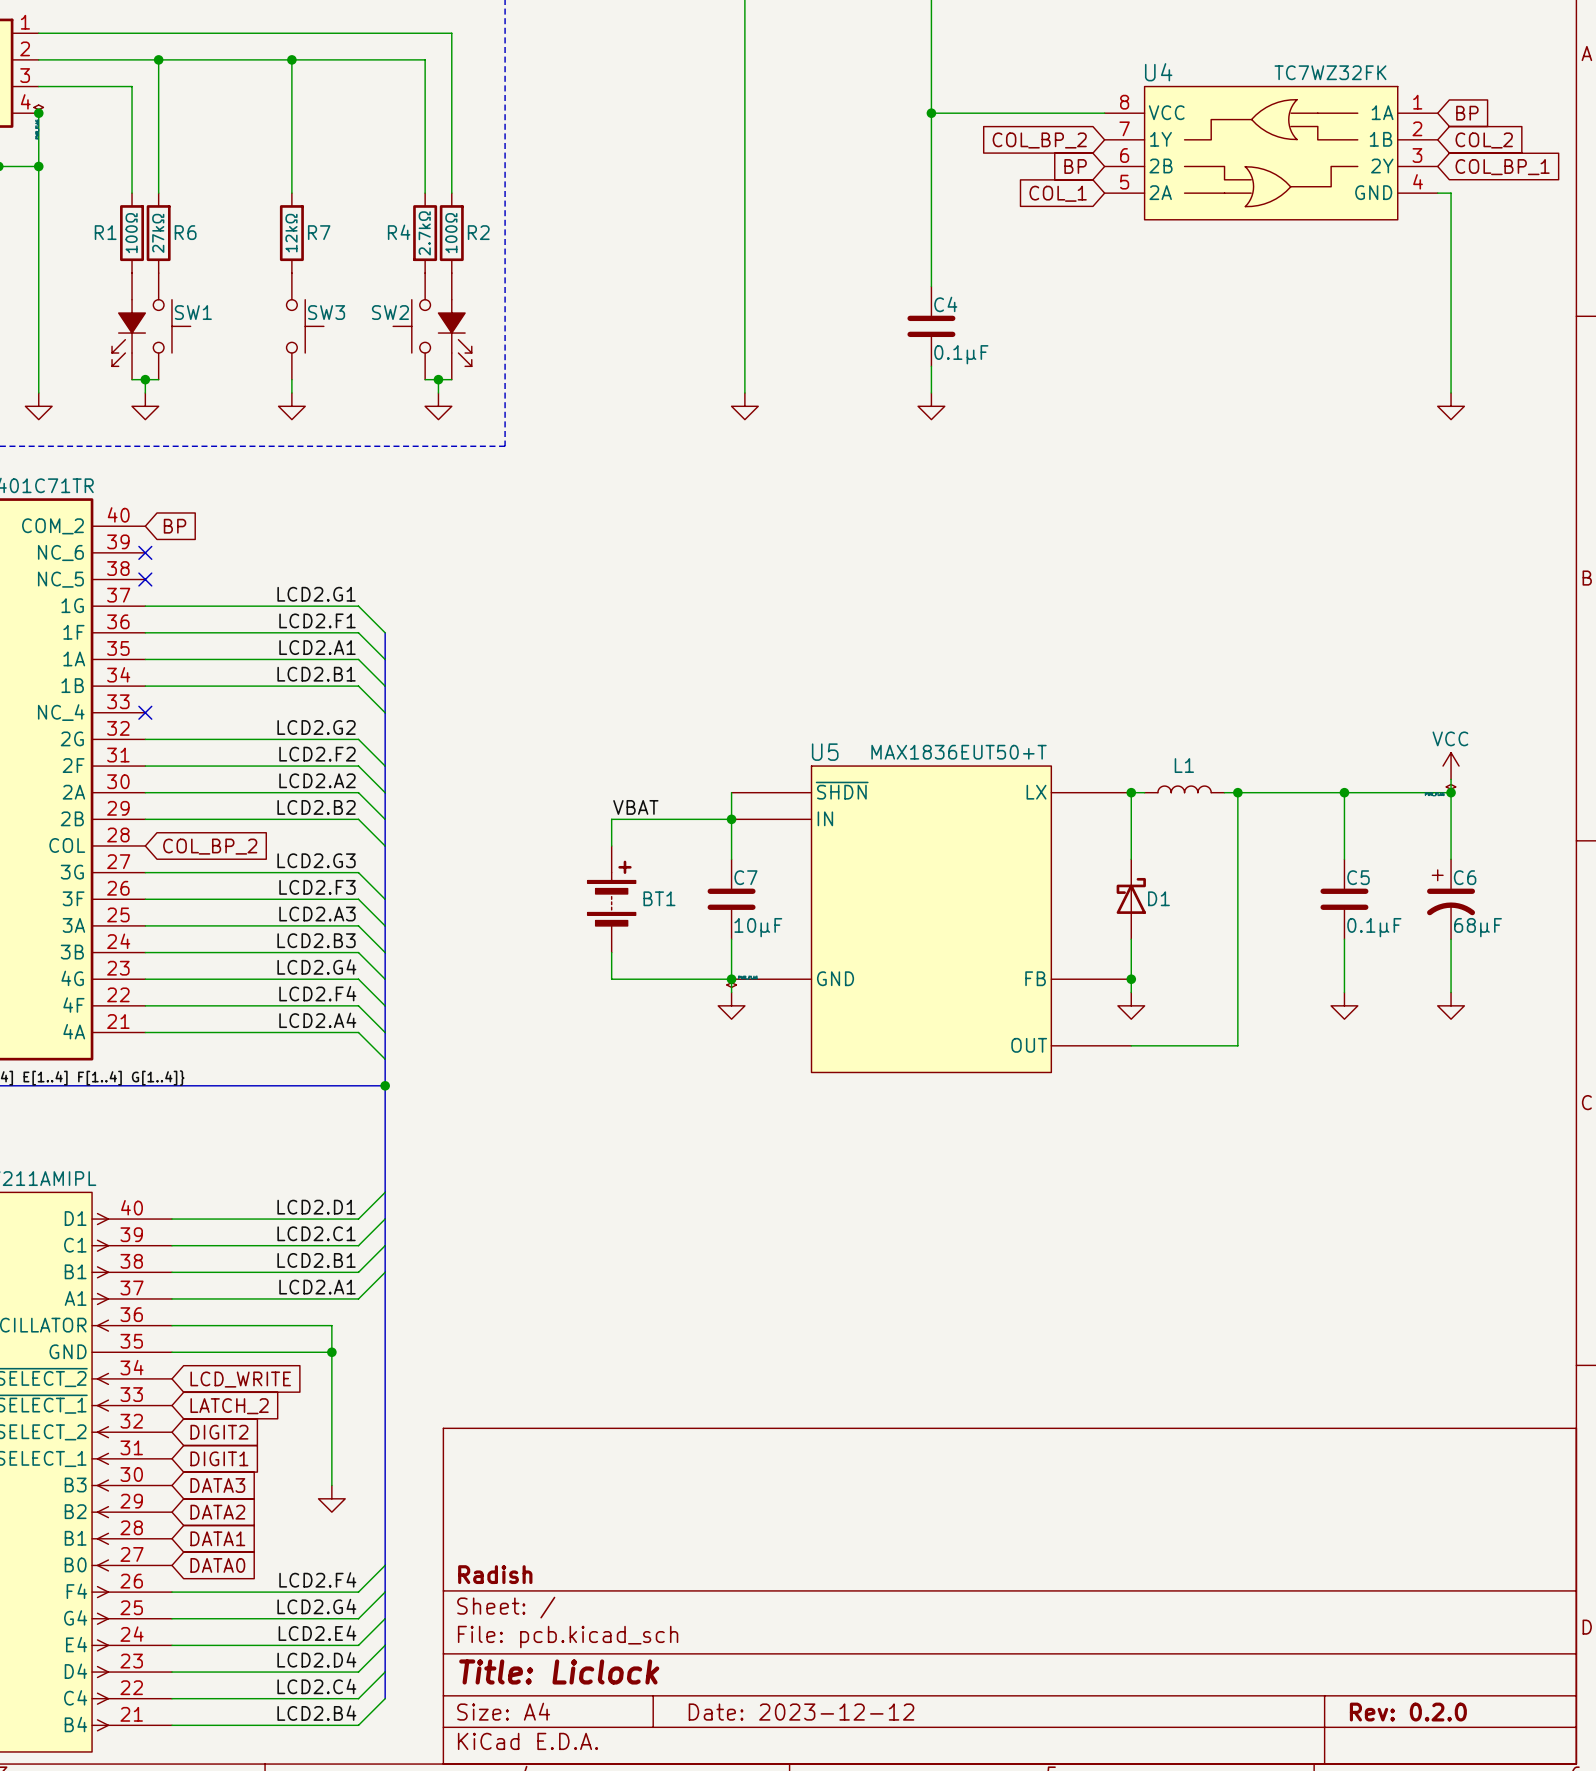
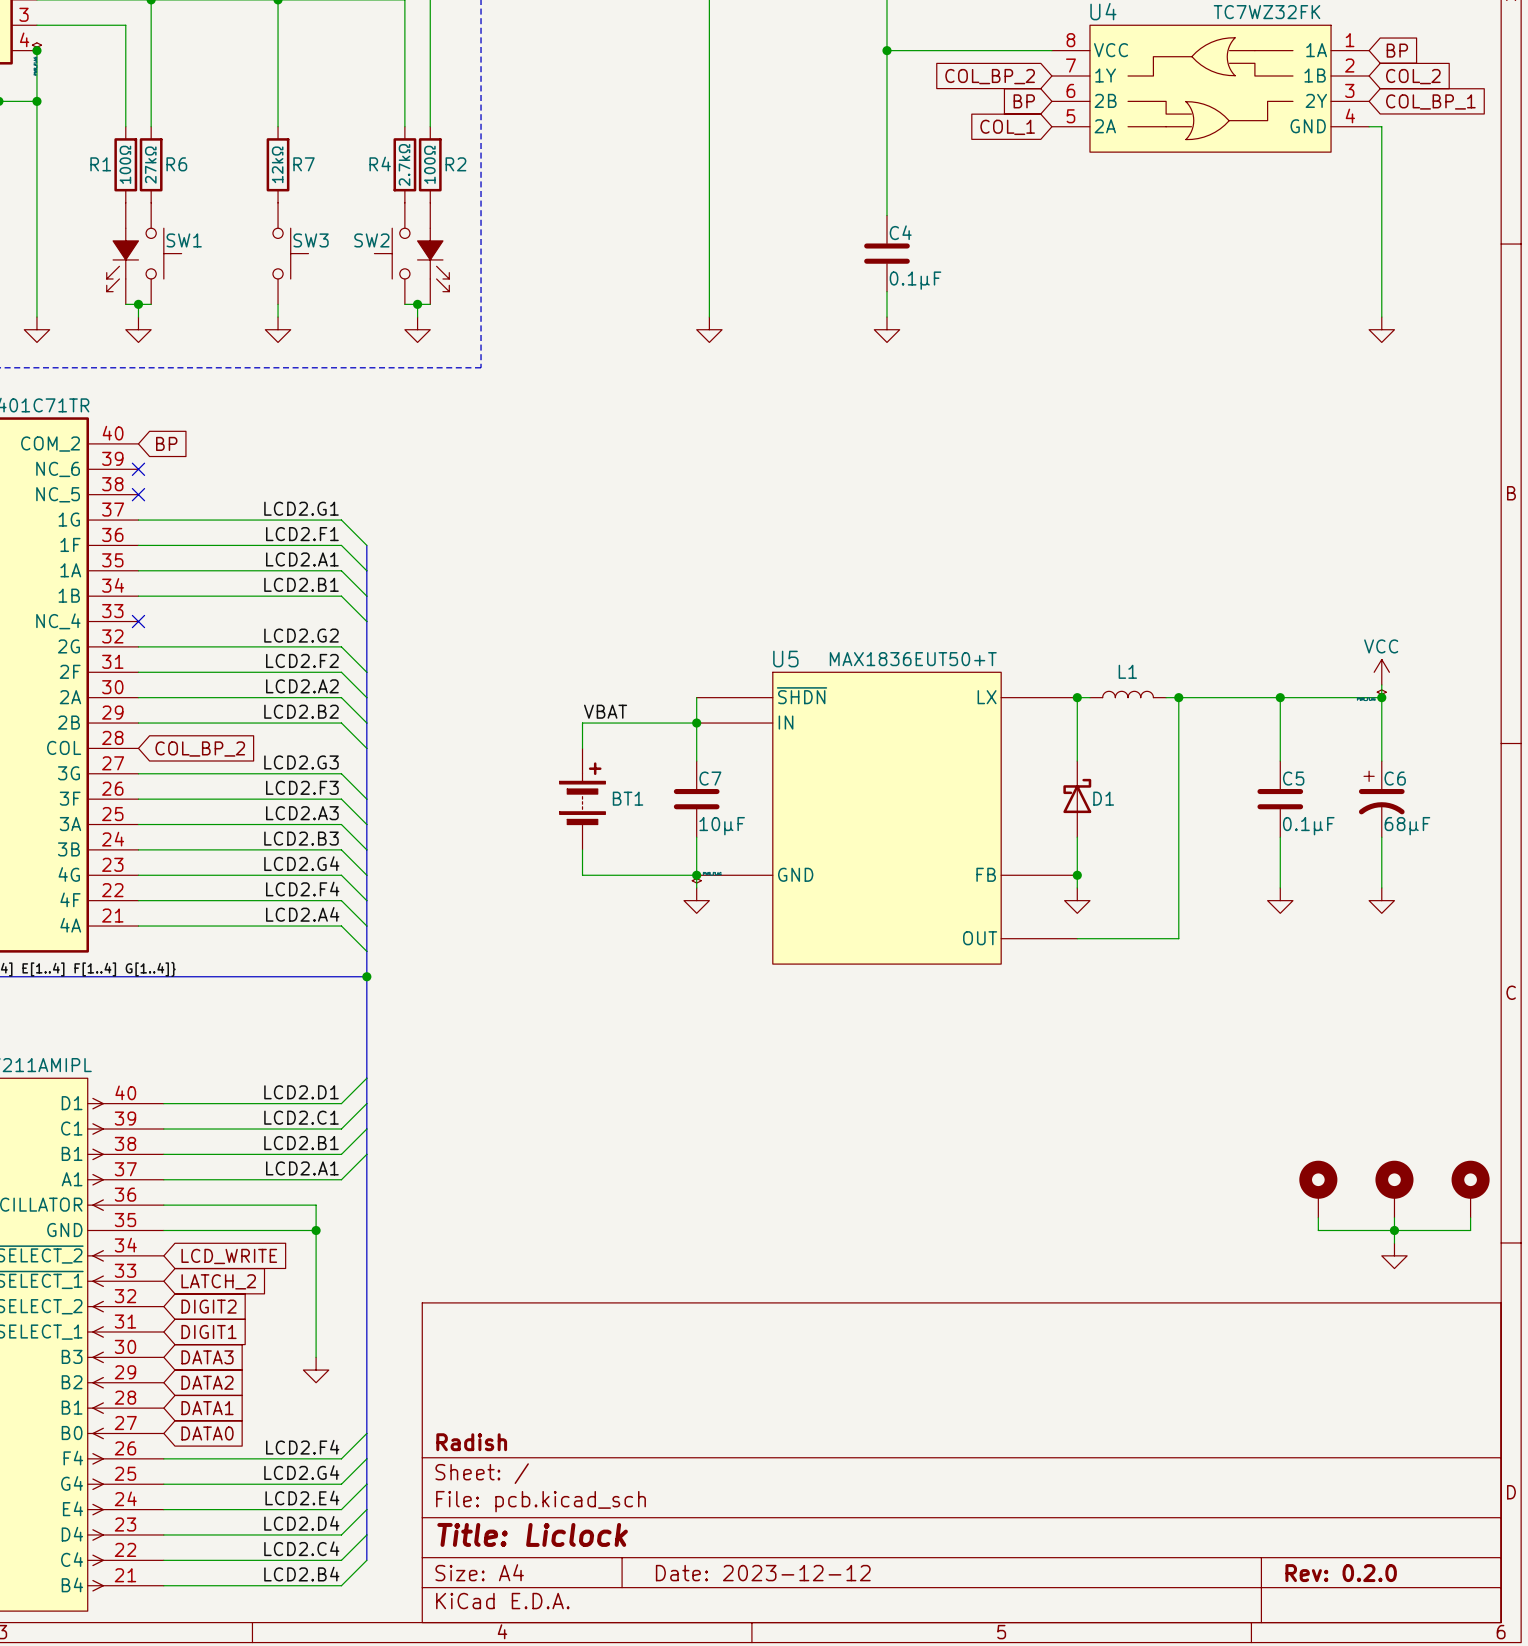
part: none -> (1318, 1189)
part: none -> (1394, 1189)
part: none -> (1470, 1189)
wire: none -> (1318, 1217) (1318, 1230) (1470, 1230) (1470, 1217)
wire: none -> (1394, 1217) (1394, 1243)
junction: none -> (1394, 1230)
power symbol: none -> (1394, 1255)

